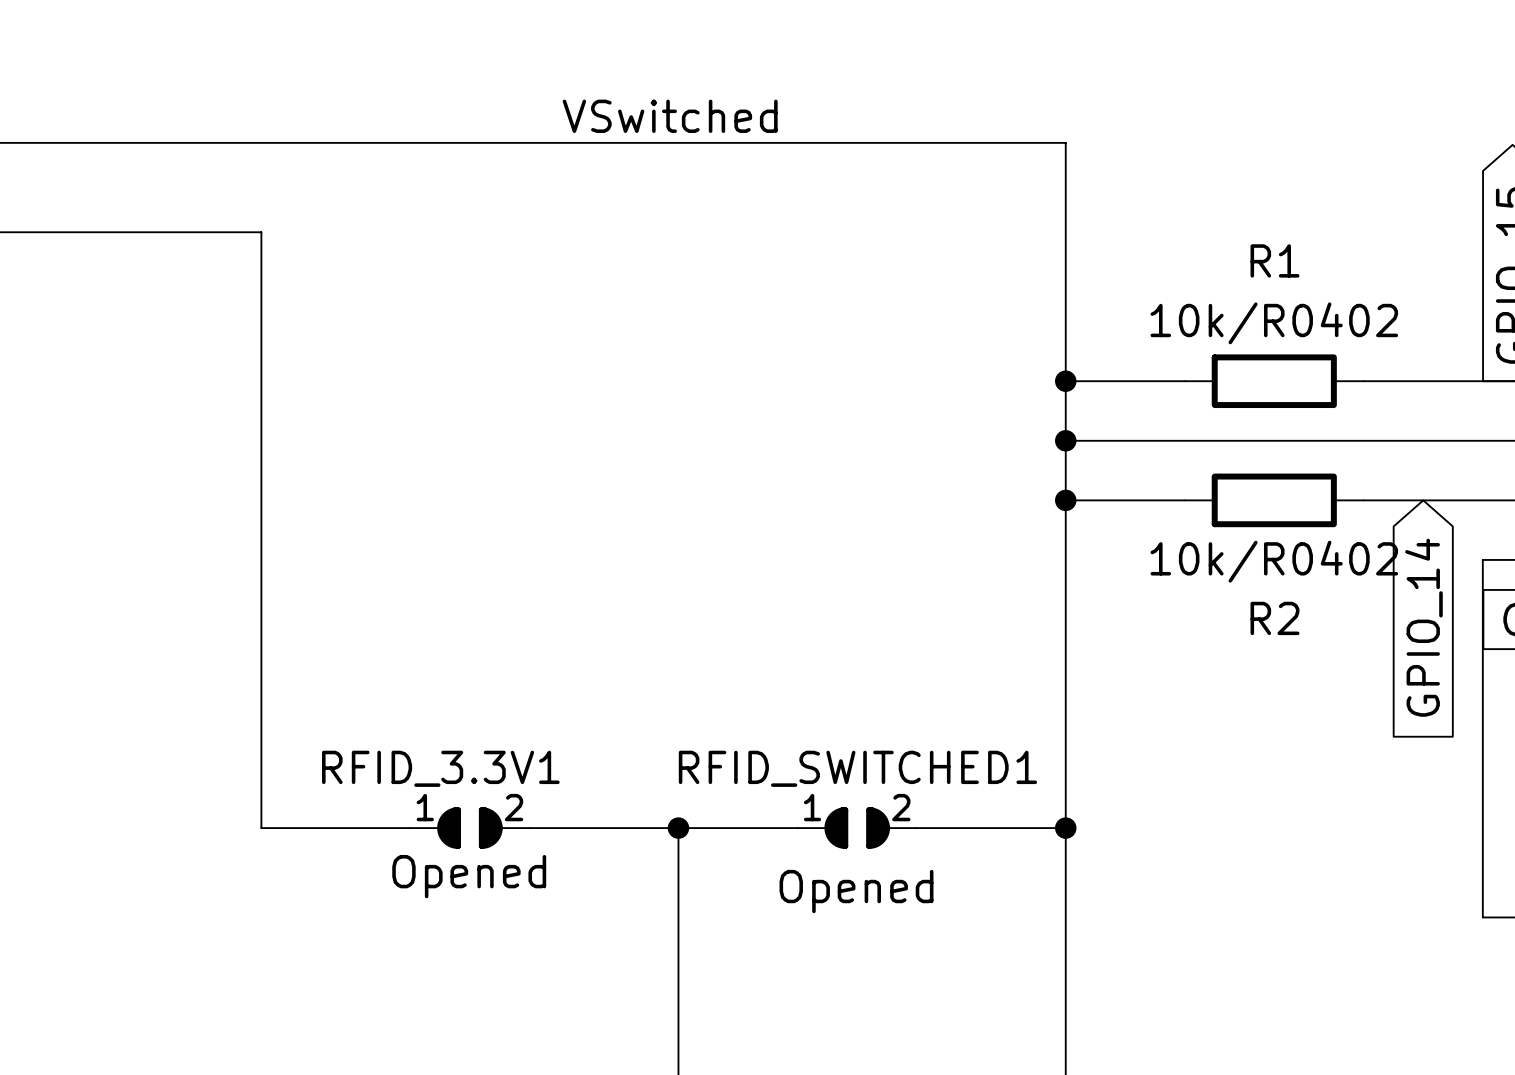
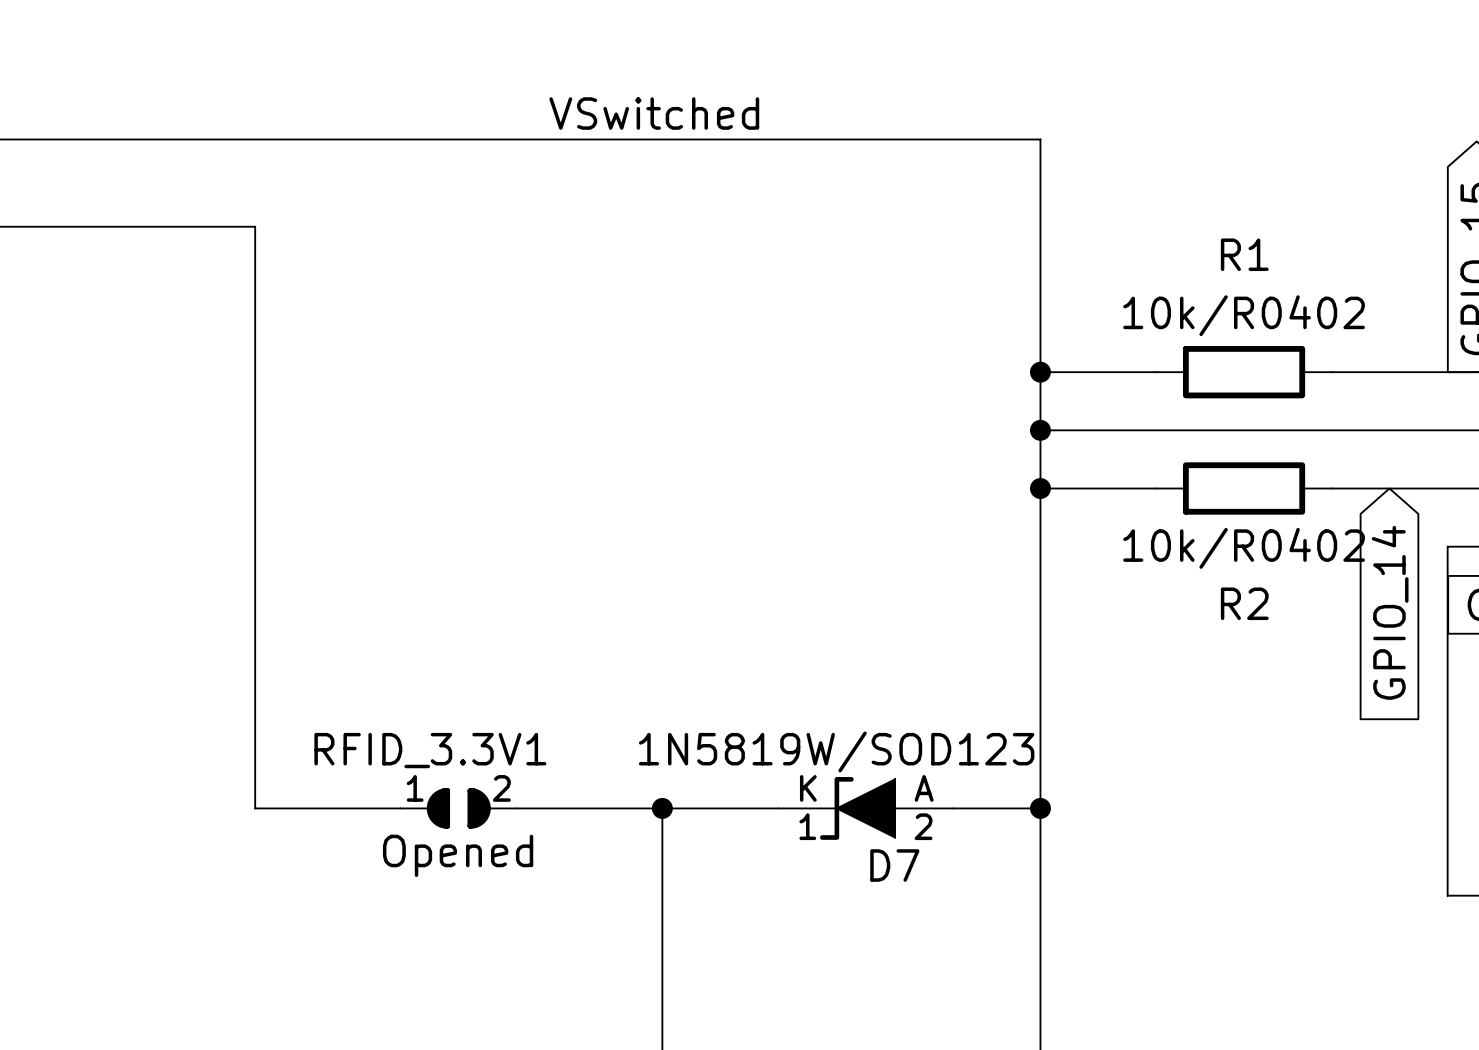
RFID_SWITCHED1: Opened (857, 828) -> none
D7: none -> 1N5819W/SOD123 (865, 808)

